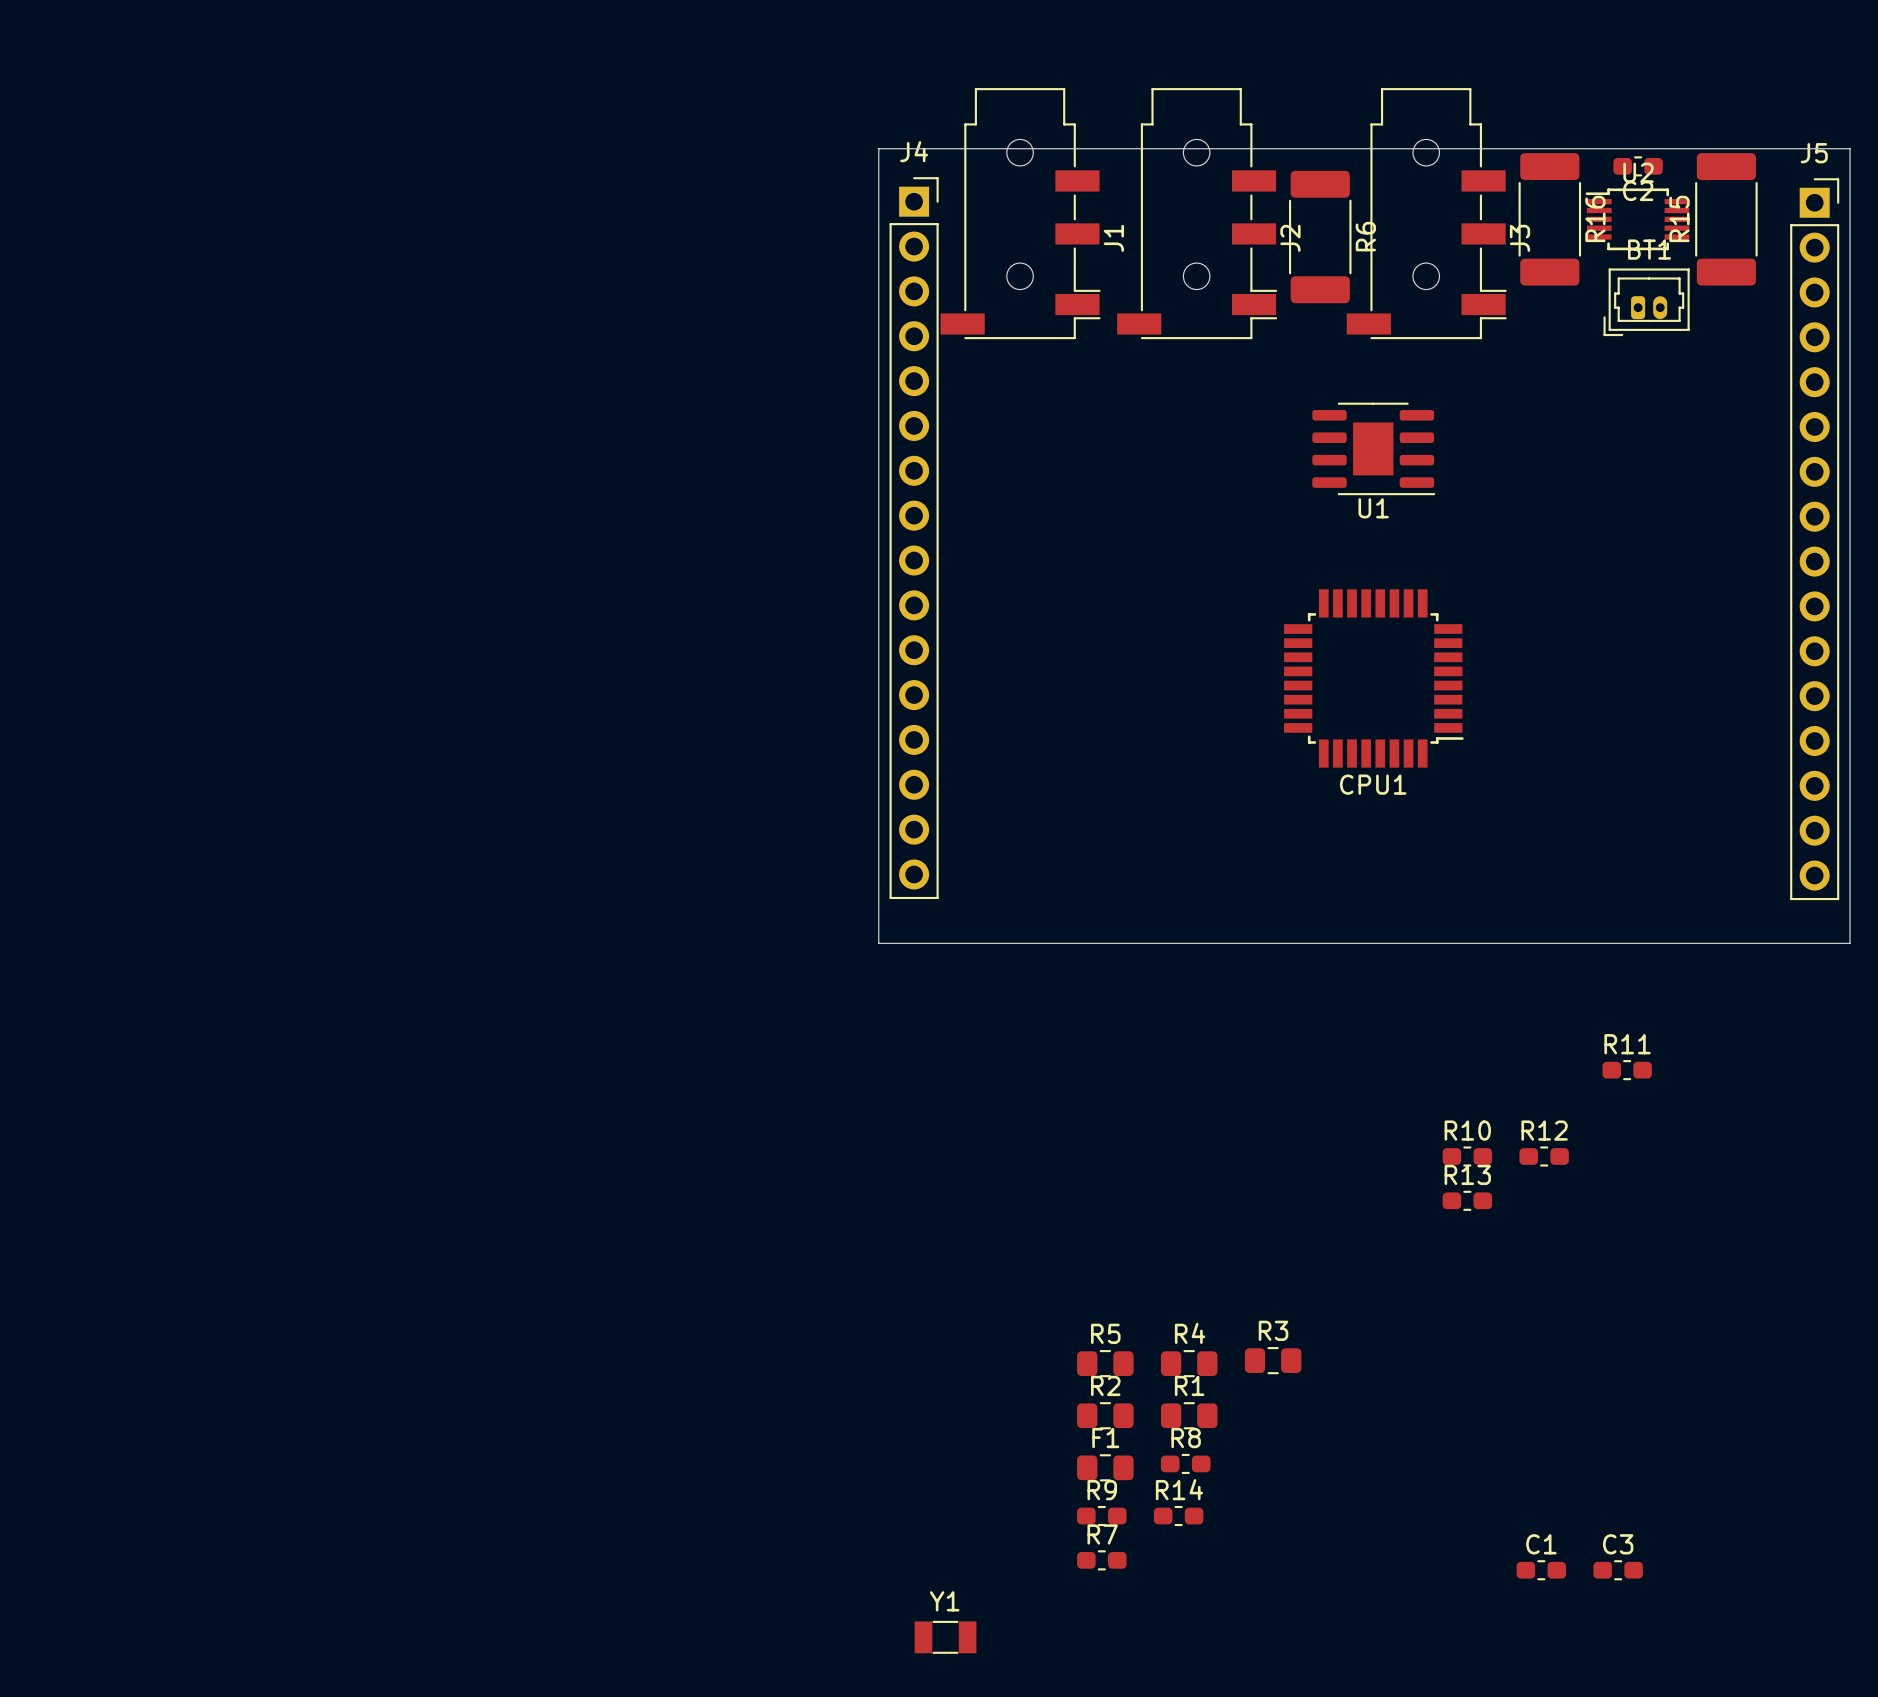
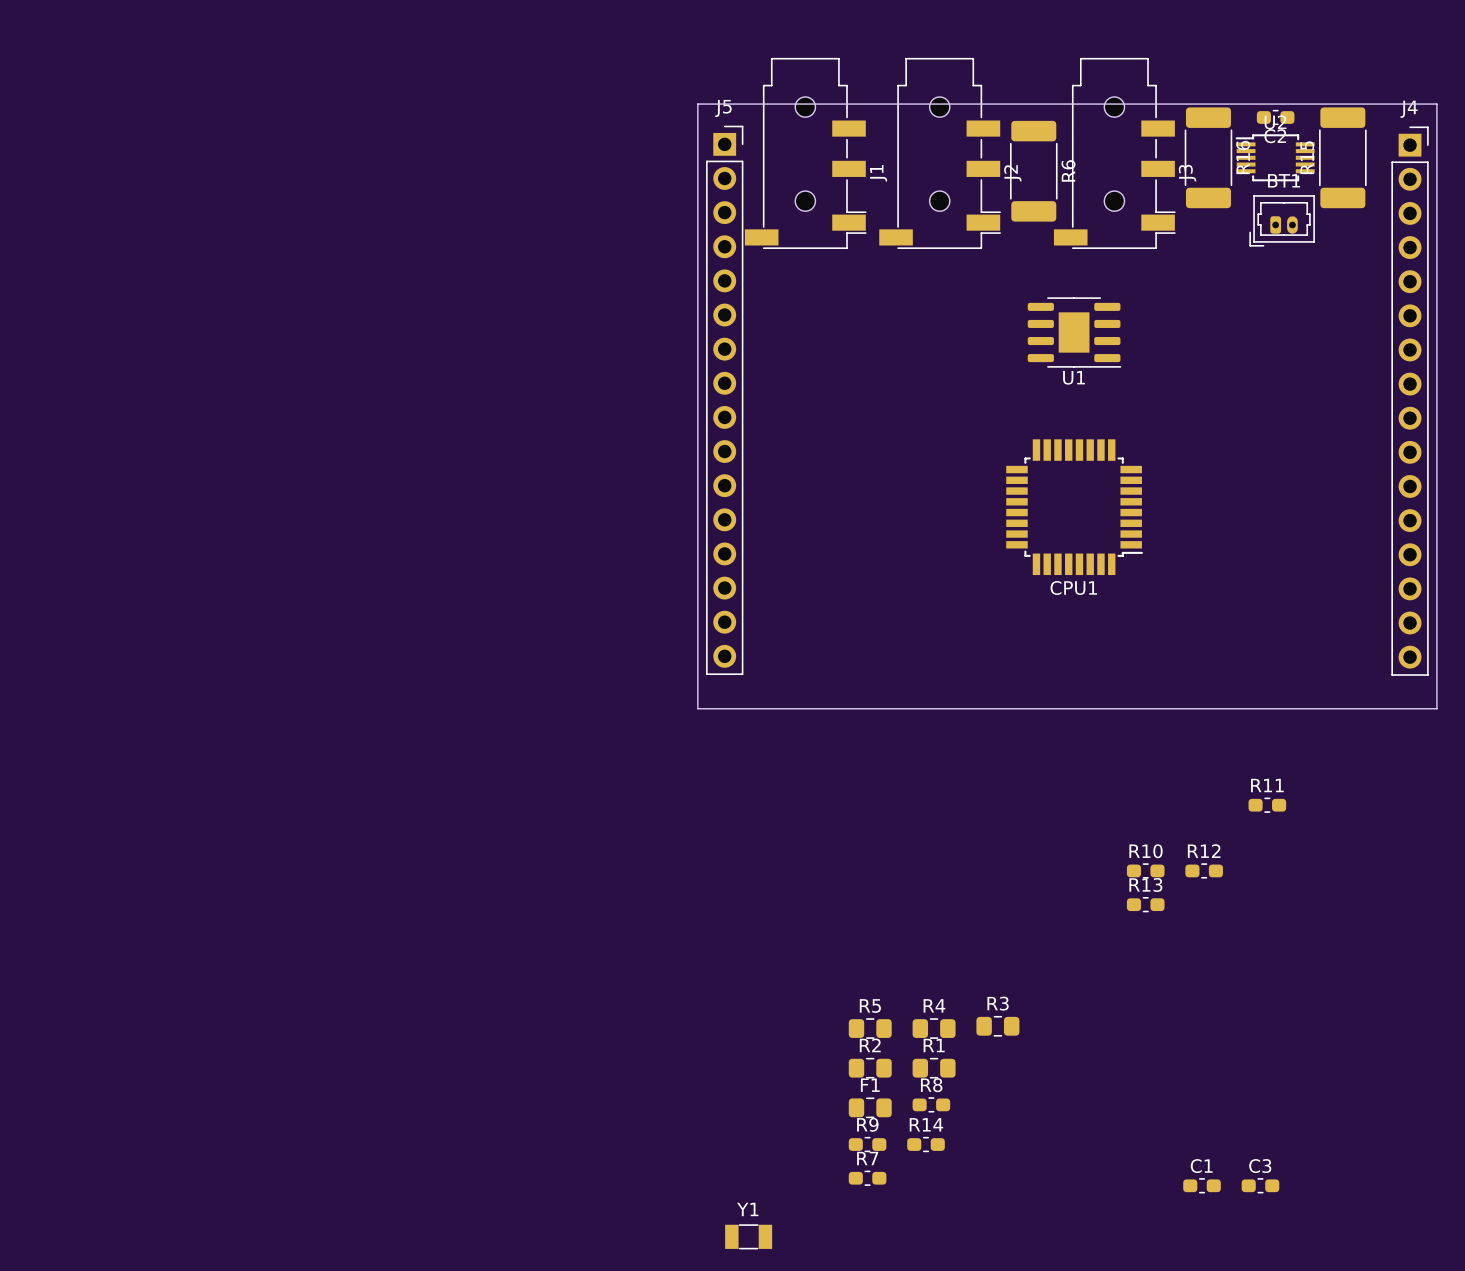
J4 name: J4 (914, 151) -> J5 (723, 108)
J5 name: J5 (1814, 153) -> J4 (1409, 109)

